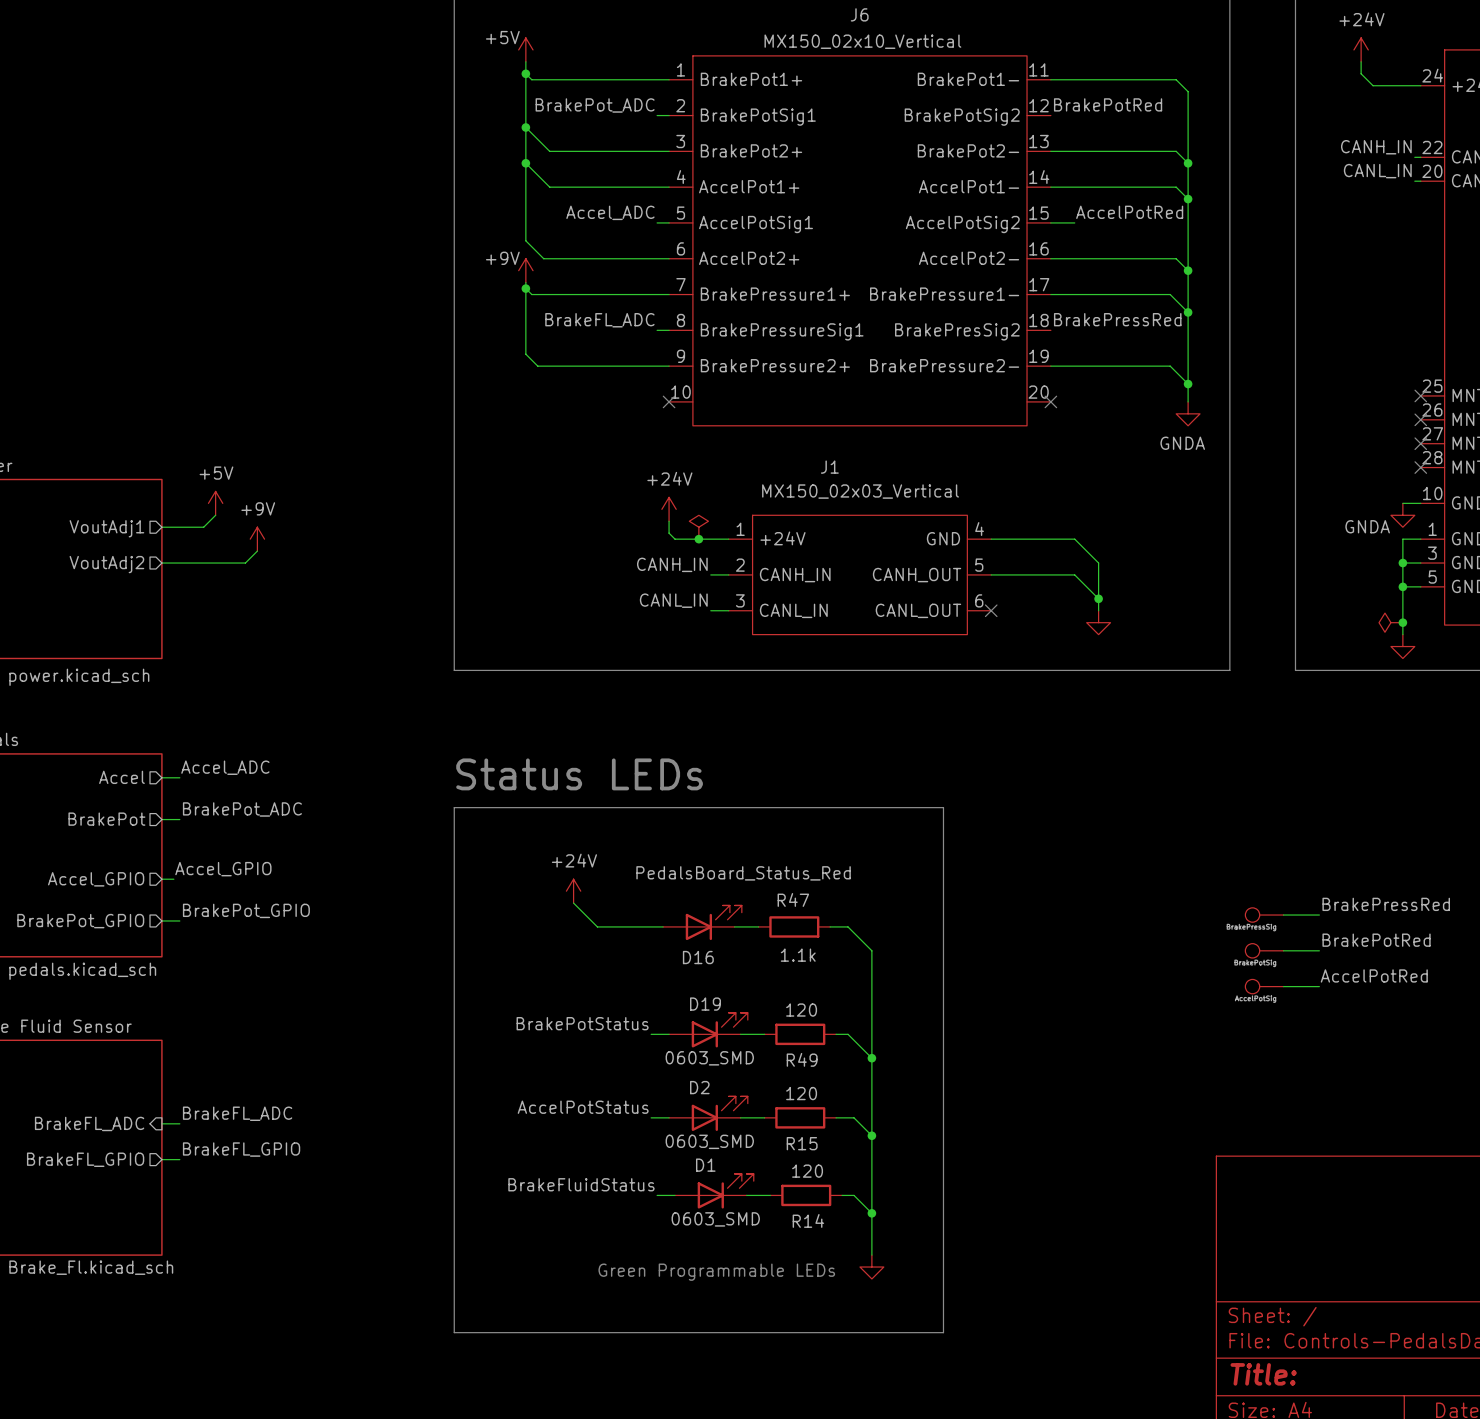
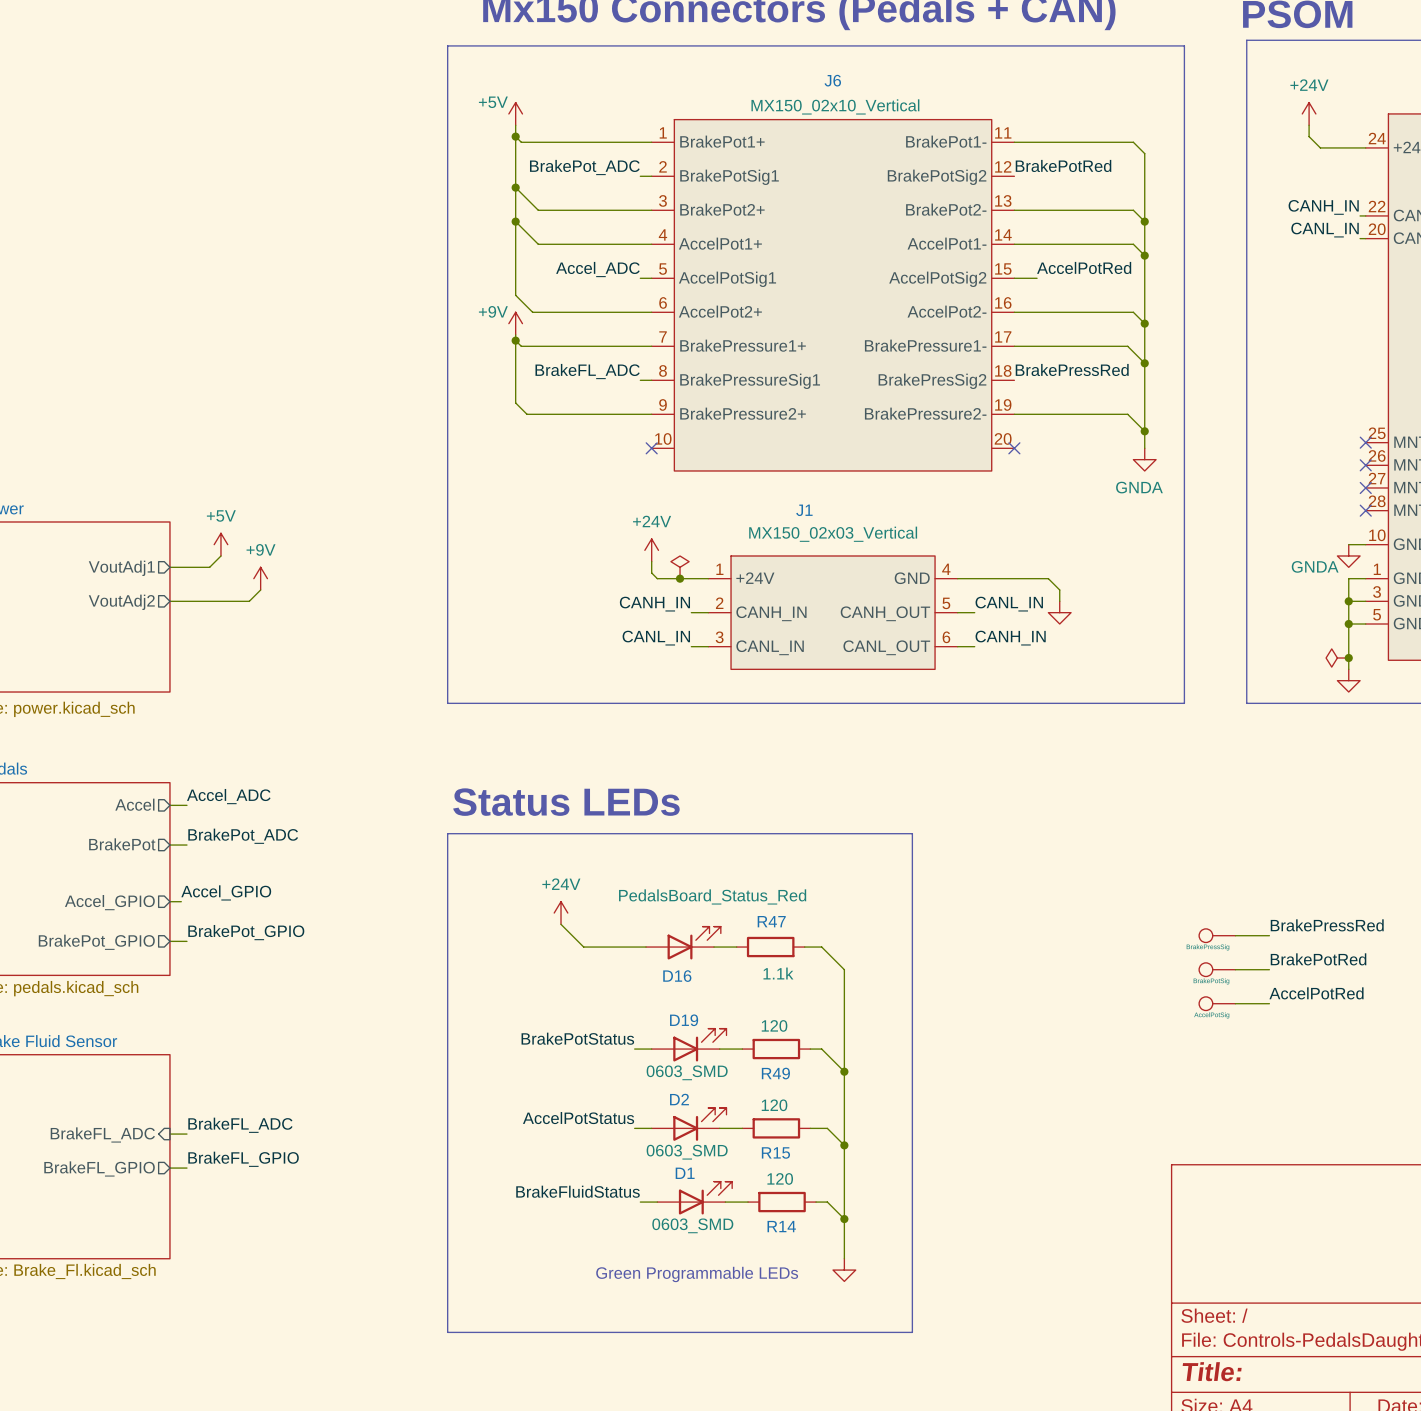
wire: (1074, 539) (1098, 563) (1098, 610) -> (1037, 578) (1048, 578) (1059, 590) (1059, 601)
label: none -> CANL_IN (1009, 604)
wire: (1009, 574) (1074, 574) (1098, 598) -> none
junction: (1098, 598) -> none
label: none -> CANH_IN (1010, 638)
wire: none -> (957, 646) (974, 646)
no-connect mark: (991, 610) -> none
power symbol position: (1098, 622) -> (1059, 612)

